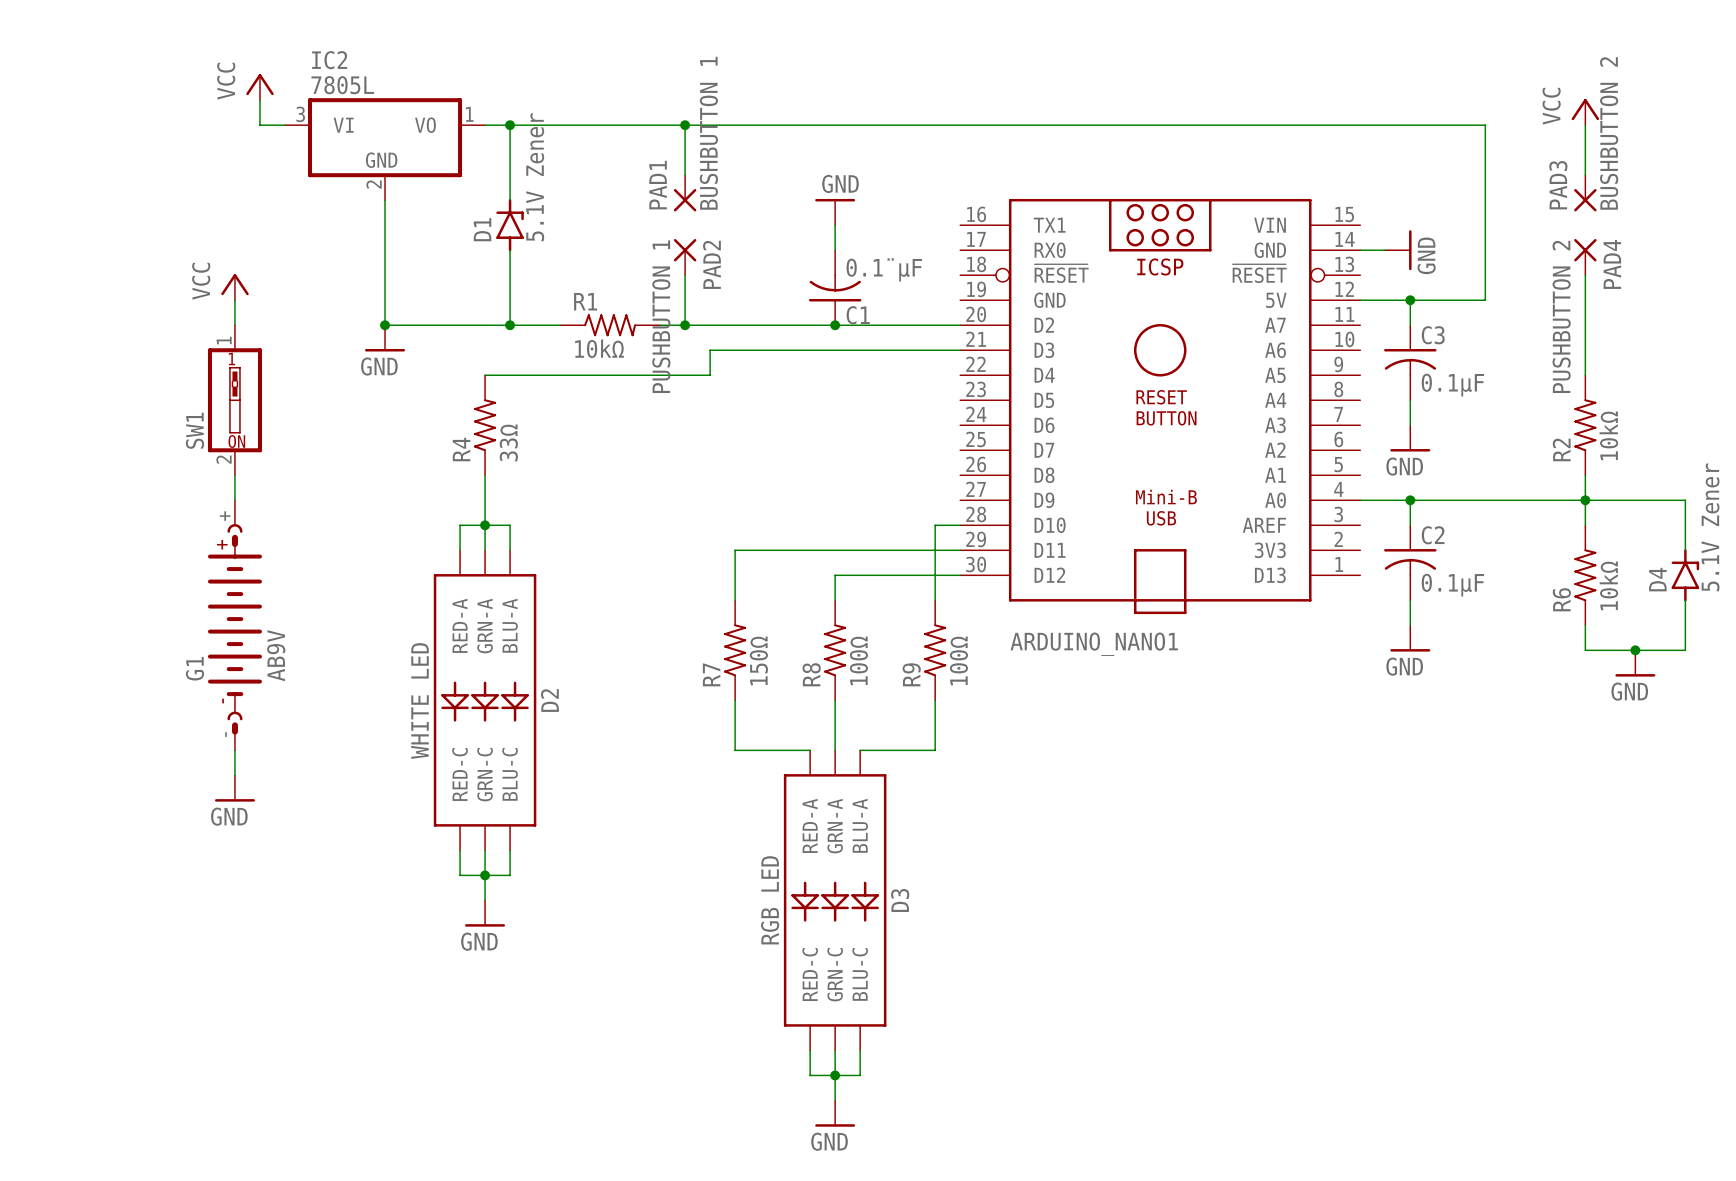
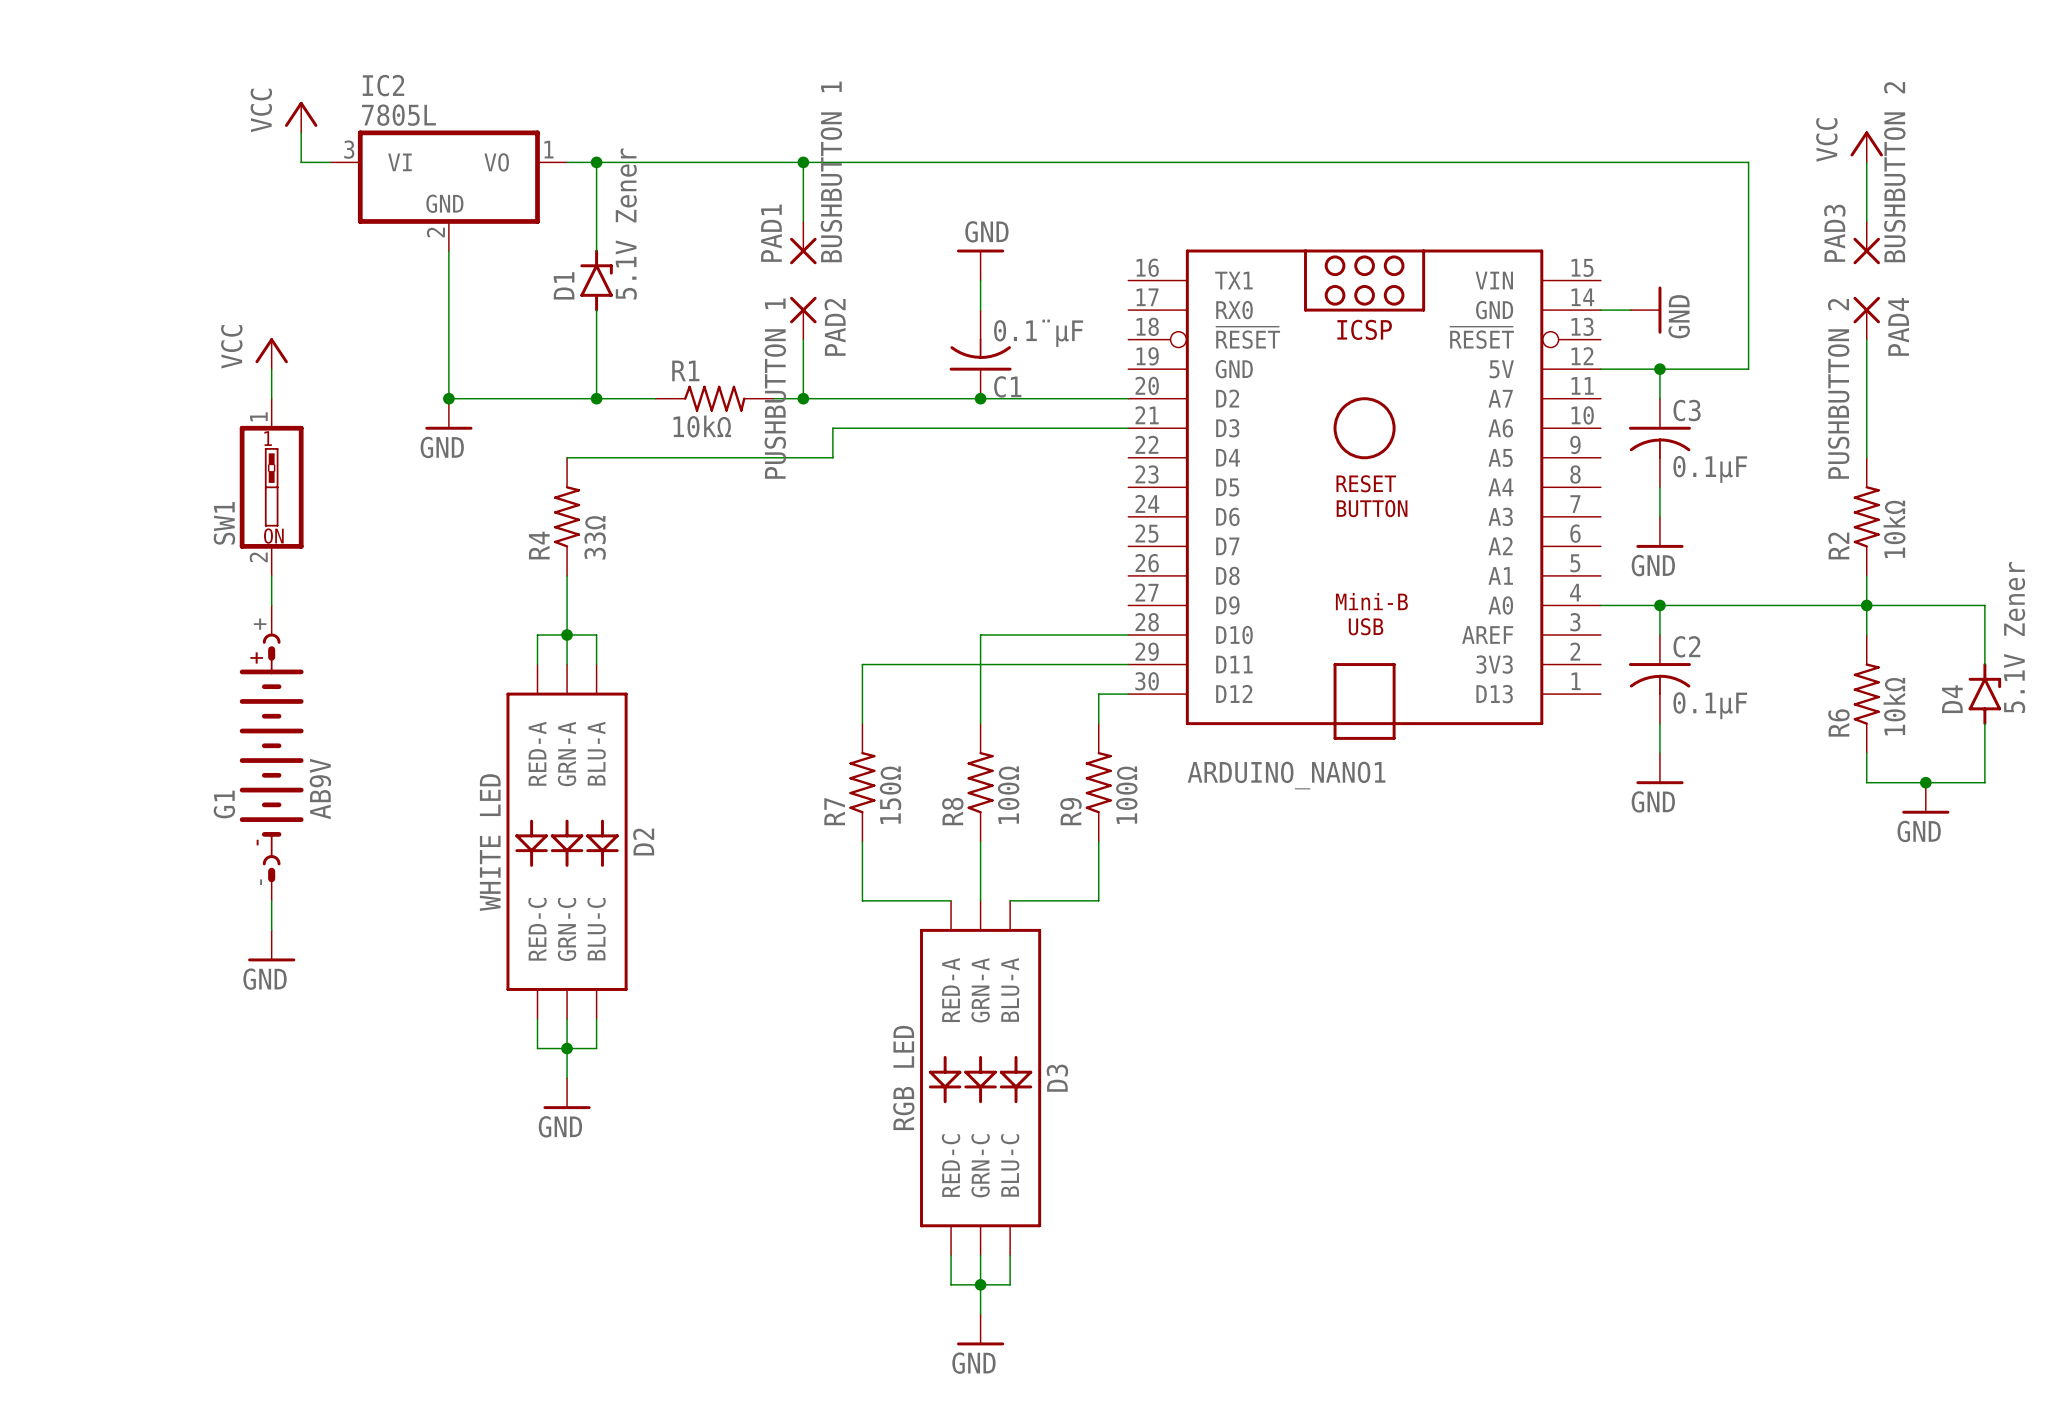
wire: (935, 525) (935, 575) (835, 575) -> (1098, 635) (980, 635) (980, 694)

